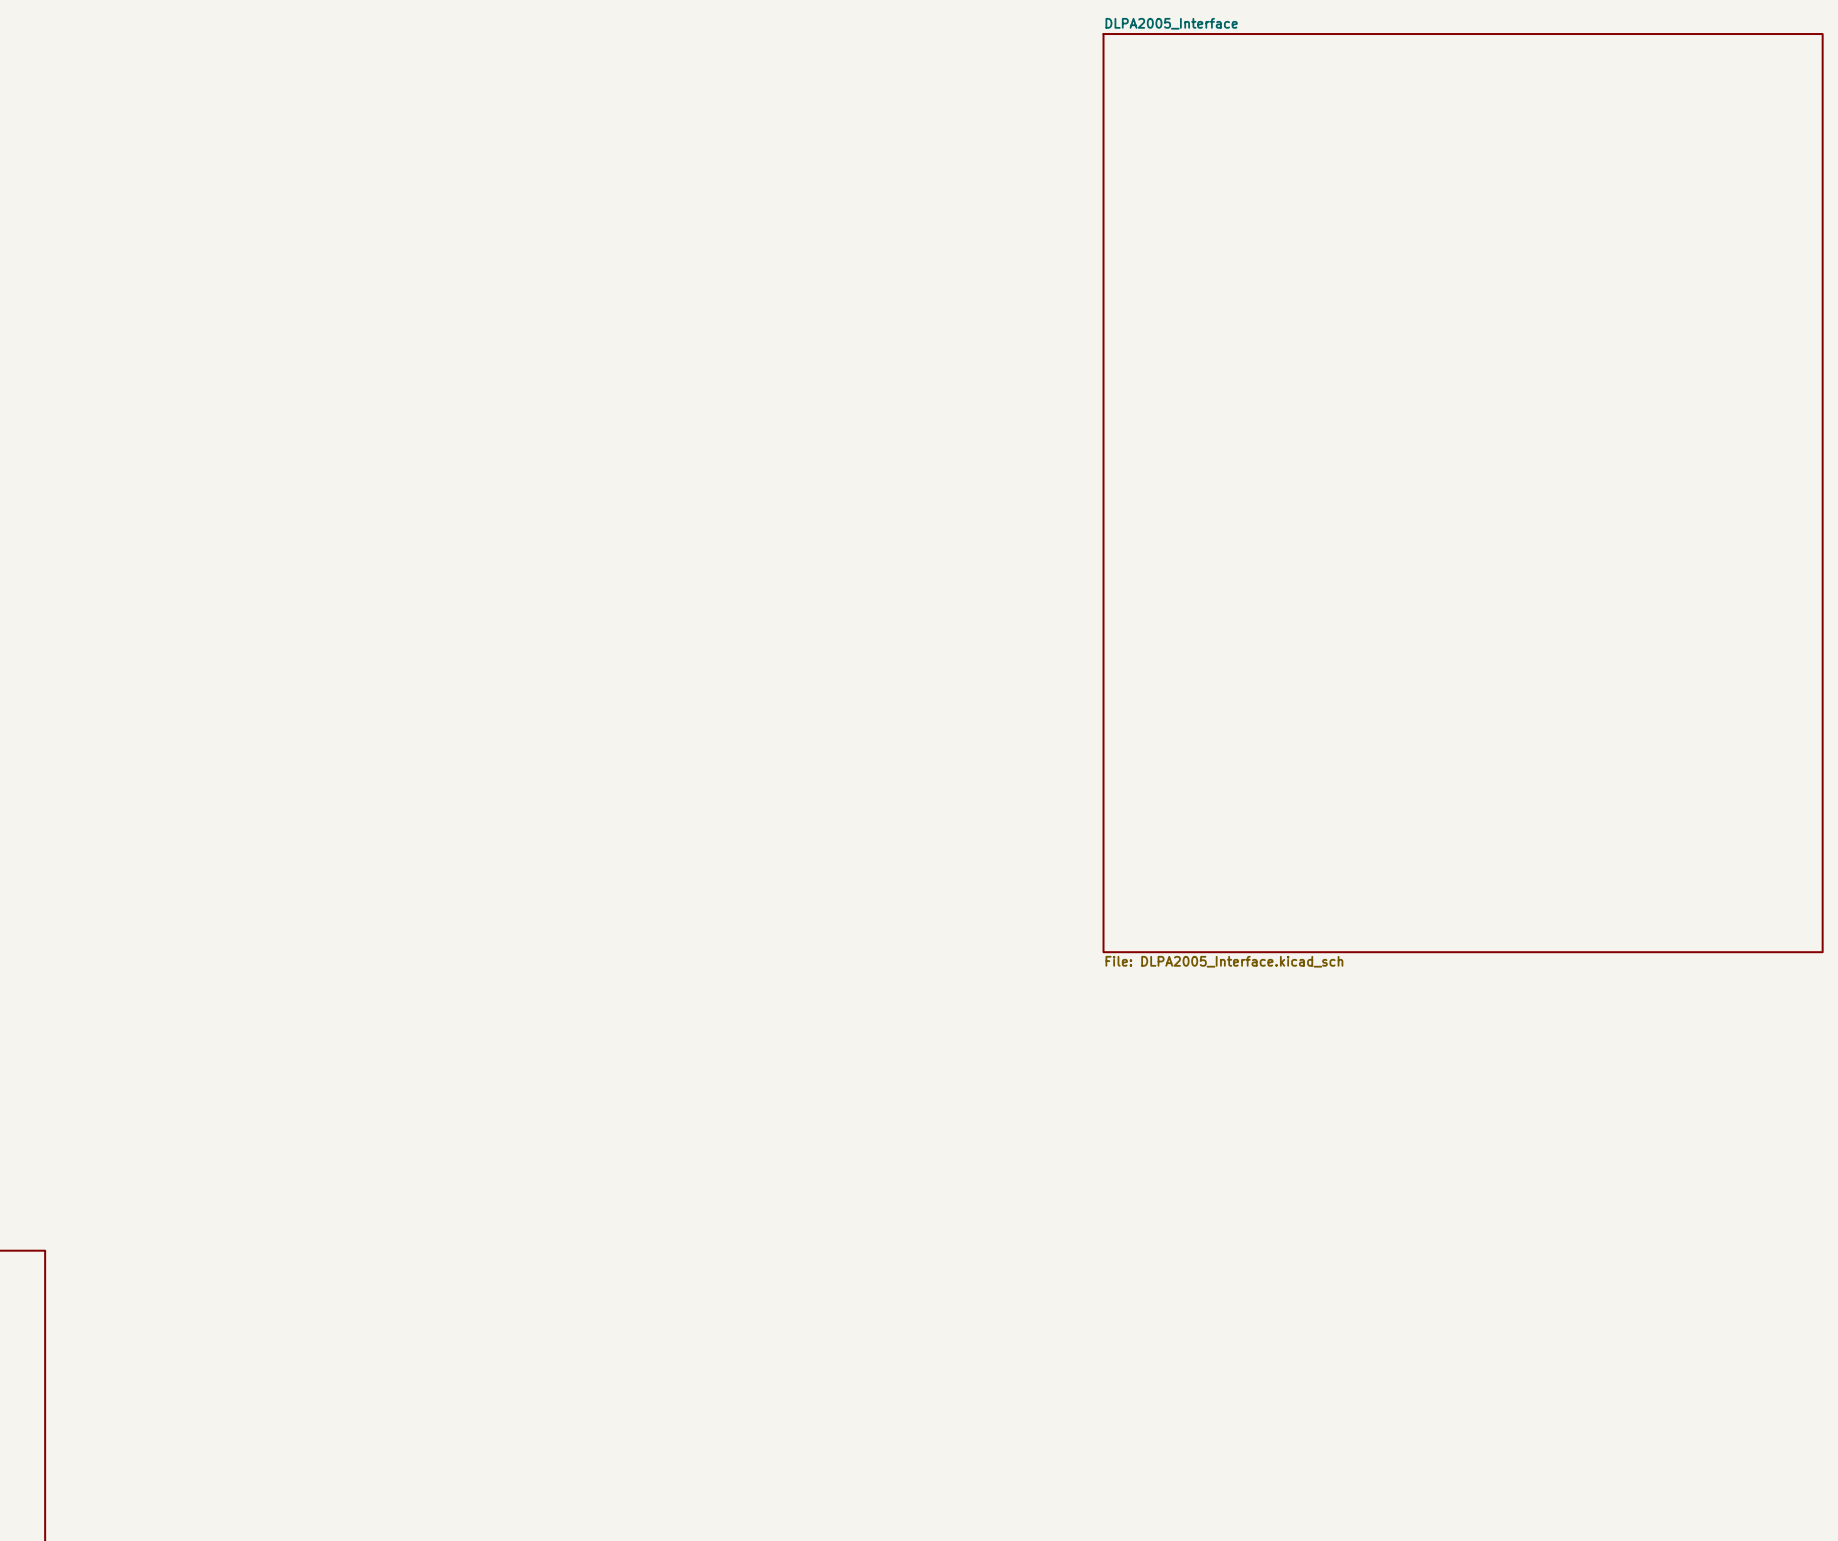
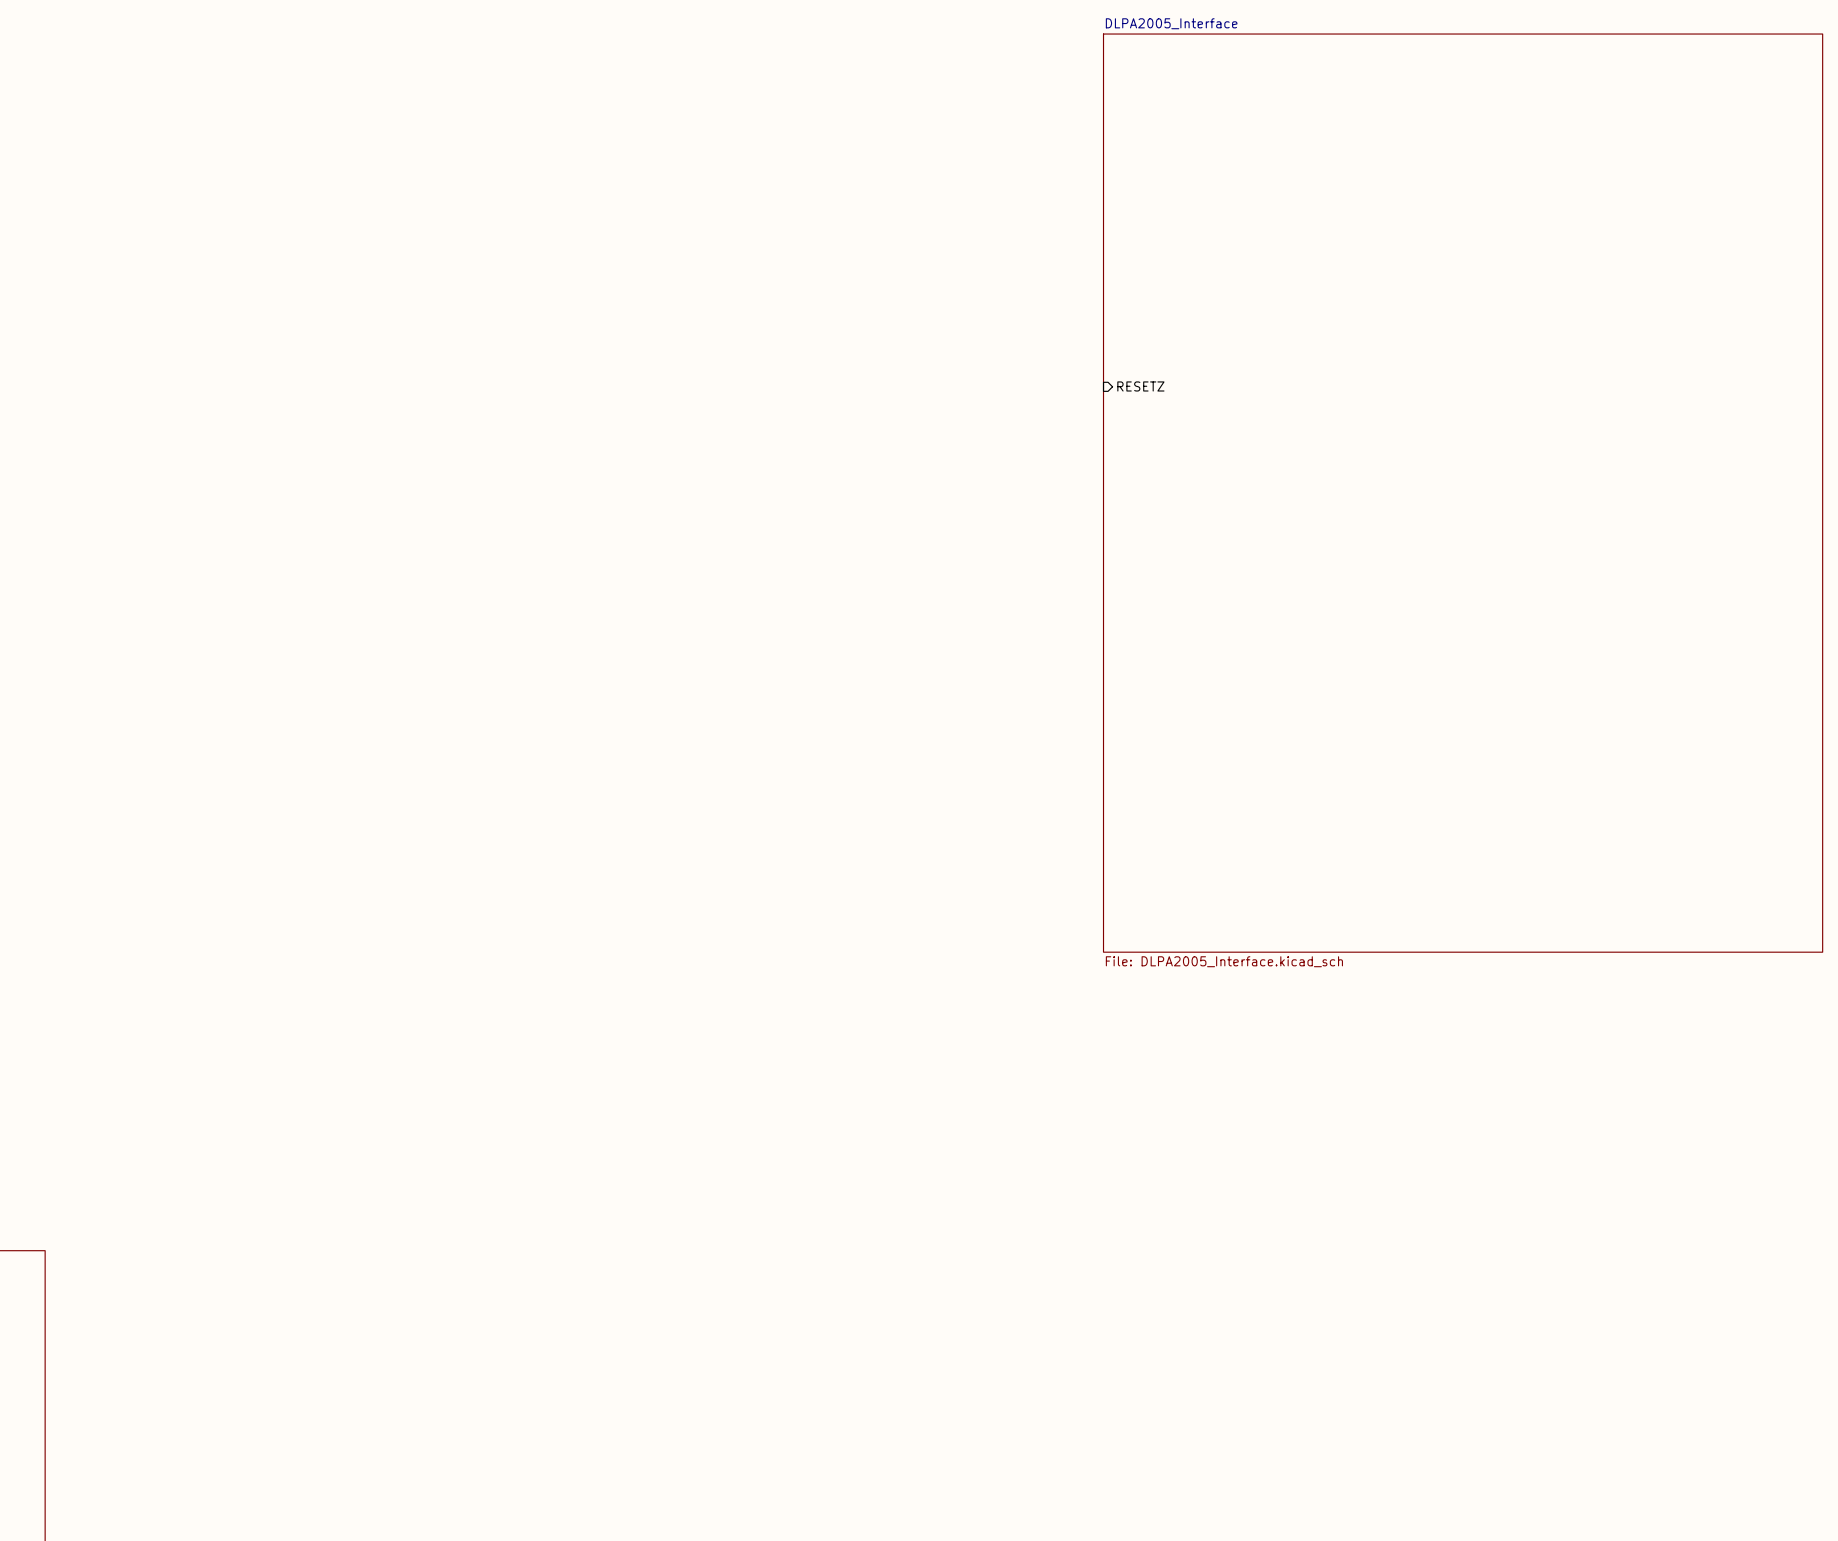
sheet pin: none -> RESETZ (1140, 386)

